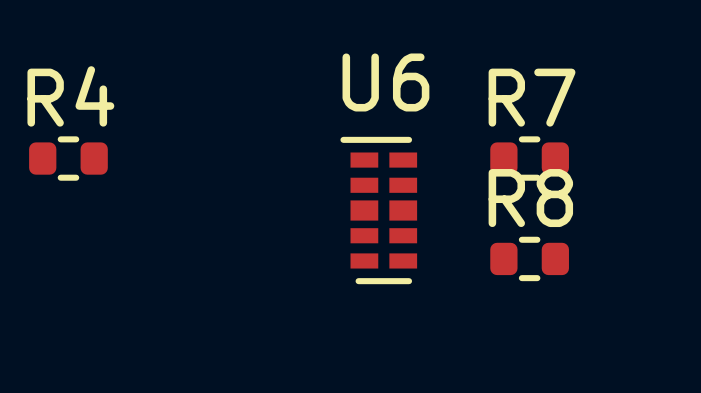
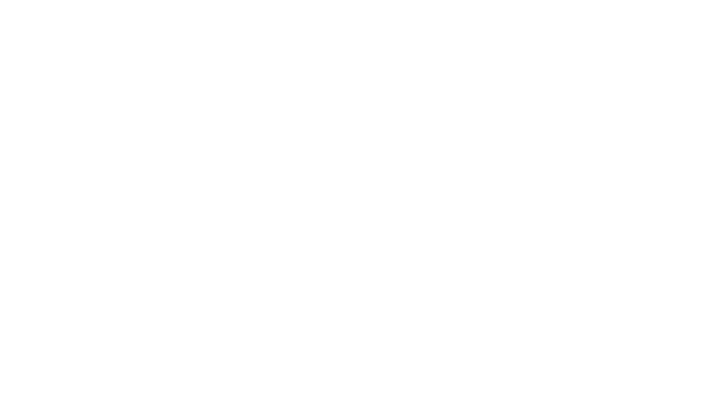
R4: (68, 158) -> none
R7: (529, 158) -> none
U6: (378, 210) -> none
R8: (529, 258) -> none

